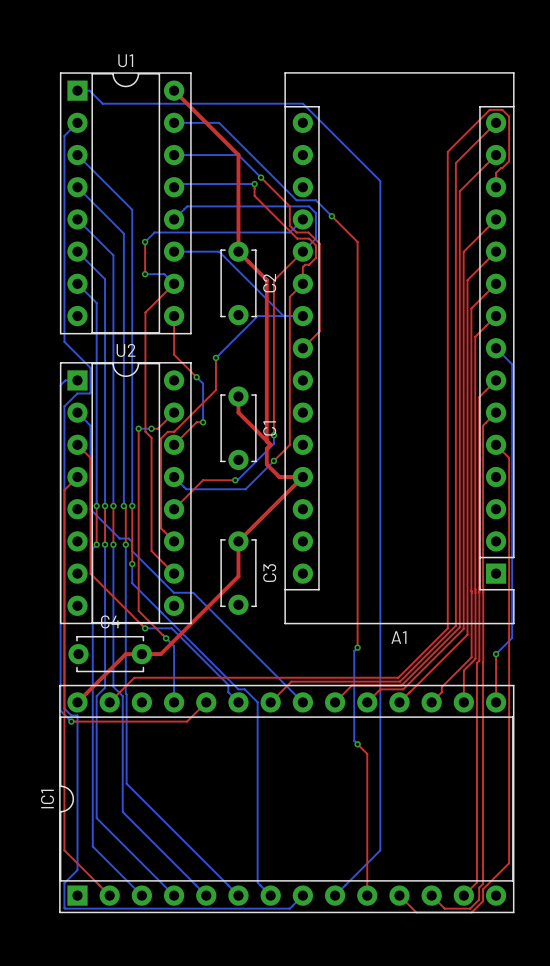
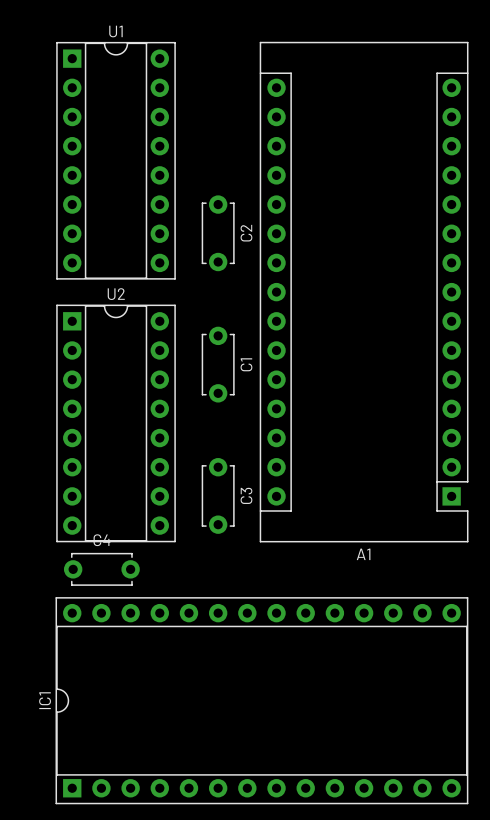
bottom track: (77, 90) (89, 90) (102, 103) (303, 103) (380, 180) (380, 850) (335, 895) -> none
top track: (174, 90) (238, 155) (238, 251) (266, 279) (266, 440) -> none
bottom track: (77, 122) (64, 135) (64, 341) (90, 367) (90, 392) (77, 393) (64, 406) (64, 708) (71, 715) (77, 715) (77, 870) (64, 883) (64, 908) (289, 908) (302, 895) -> none
bottom track: (174, 122) (219, 122) (296, 200) (315, 200) (331, 216) -> none
top track: (496, 122) (455, 163) (455, 625) (400, 681) (291, 681) (270, 702) -> none
bottom track: (77, 155) (132, 209) (132, 506) -> none
bottom track: (174, 155) (238, 155) (261, 177) -> none
top track: (496, 155) (459, 191) (459, 627) (401, 685) (352, 685) (335, 702) -> none
top track: (261, 177) (289, 206) (289, 225) (296, 232) (308, 232) (319, 243) (319, 331) (302, 348) -> none
via: (261, 177) -> none
bottom track: (254, 184) (177, 184) (174, 187) -> none
top track: (254, 184) (254, 195) (297, 238) (309, 238) (315, 245) (315, 257) (309, 264) (302, 267) (302, 283) (289, 296) (289, 445) (273, 460) -> none
via: (254, 184) -> none
bottom track: (77, 187) (123, 233) (123, 506) -> none
top track: (496, 187) (496, 172) (509, 161) (509, 116) (502, 109) (489, 109) (447, 151) (447, 628) (398, 677) (134, 677) (109, 702) -> none
top track: (331, 216) (357, 241) (357, 647) -> none
via: (331, 216) -> none
bottom track: (77, 219) (113, 255) (113, 506) -> none
bottom track: (174, 219) (187, 206) (309, 206) (315, 213) (315, 238) (302, 251) -> none
bottom track: (302, 219) (289, 232) (154, 232) (145, 241) -> none
top track: (496, 219) (463, 251) (463, 628) (403, 689) (380, 689) (367, 702) -> none
top track: (145, 241) (145, 274) -> none
via: (145, 241) -> none
bottom track: (77, 251) (105, 279) (105, 506) -> none
bottom track: (174, 251) (219, 251) (283, 316) -> none
top track: (302, 251) (273, 280) (273, 435) -> none
top track: (496, 251) (467, 280) (467, 634) (399, 702) -> none
bottom track: (145, 274) (164, 274) (174, 283) -> none
via: (145, 274) -> none
bottom track: (77, 283) (96, 303) (96, 506) -> none
top track: (174, 283) (145, 312) (145, 431) (151, 437) (151, 551) (174, 573) -> none
top track: (496, 283) (471, 308) (471, 657) (441, 687) (441, 692) (431, 702) -> none
top track: (174, 316) (174, 354) (196, 377) -> none
bottom track: (302, 316) (257, 316) (215, 357) -> none
top track: (496, 316) (475, 336) (475, 658) (463, 670) (463, 702) -> none
bottom track: (496, 348) (512, 364) (512, 638) (496, 654) -> none
top track: (215, 357) (215, 390) (174, 431) (167, 431) (161, 438) (161, 528) (174, 541) -> none
via: (215, 357) -> none
bottom track: (196, 377) (203, 383) (203, 422) -> none
via: (196, 377) -> none
bottom track: (77, 380) (65, 380) (60, 385) (60, 710) (71, 721) -> none
top track: (496, 380) (479, 397) (476, 882) (463, 895) -> none
top track: (238, 396) (238, 412) (270, 444) (266, 448) (266, 464) (279, 477) (302, 477) (238, 541) (238, 576) (160, 654) (125, 654) (77, 702) -> none
bottom track: (77, 412) (90, 425) (90, 509) (119, 538) (128, 538) (131, 541) (131, 550) (173, 592) (193, 592) (302, 702) -> none
top track: (174, 412) (157, 428) (151, 428) -> none
top track: (496, 412) (483, 425) (483, 883) (479, 887) (479, 899) (470, 908) (444, 908) (431, 895) -> none
top track: (203, 422) (196, 422) (174, 444) -> none
via: (203, 422) -> none
bottom track: (138, 428) (151, 428) -> none
top track: (138, 428) (138, 610) (166, 638) -> none
via: (138, 428) -> none
via: (151, 428) -> none
bottom track: (273, 435) (273, 443) (237, 480) (235, 480) -> none
via: (273, 435) -> none
top track: (77, 444) (90, 457) (90, 573) (145, 628) -> none
top track: (496, 444) (509, 457) (509, 863) (483, 889) (483, 901) (471, 912) (416, 912) (399, 895) -> none
bottom track: (273, 460) (245, 489) (186, 489) (174, 477) -> none
via: (273, 460) -> none
top track: (77, 477) (64, 490) (64, 850) (109, 895) -> none
top track: (235, 480) (203, 480) (174, 509) -> none
via: (235, 480) -> none
top track: (96, 506) (96, 544) -> none
via: (96, 506) -> none
top track: (105, 506) (105, 544) -> none
via: (105, 506) -> none
top track: (113, 506) (113, 544) -> none
via: (113, 506) -> none
top track: (123, 506) (125, 507) (125, 544) -> none
via: (123, 506) -> none
top track: (132, 506) (132, 563) -> none
via: (132, 506) -> none
bottom track: (96, 544) (92, 548) (92, 846) (141, 895) -> none
via: (96, 544) -> none
bottom track: (105, 544) (105, 687) (96, 696) (96, 818) (174, 895) -> none
via: (105, 544) -> none
bottom track: (113, 544) (113, 686) (122, 696) (122, 812) (206, 895) -> none
via: (113, 544) -> none
bottom track: (125, 544) (126, 783) (238, 895) -> none
via: (125, 544) -> none
bottom track: (132, 563) (132, 583) (238, 689) (244, 689) (257, 702) (257, 882) (270, 895) -> none
via: (132, 563) -> none
bottom track: (145, 628) (171, 628) (228, 684) (228, 692) (238, 702) -> none
via: (145, 628) -> none
bottom track: (166, 638) (174, 646) (174, 702) -> none
via: (166, 638) -> none
bottom track: (357, 647) (354, 651) (354, 740) (357, 744) -> none
via: (357, 647) -> none
top track: (496, 654) (496, 702) -> none
via: (496, 654) -> none
top track: (206, 702) (187, 721) (71, 721) -> none
via: (71, 721) -> none
top track: (357, 744) (367, 753) (367, 895) -> none
via: (357, 744) -> none

